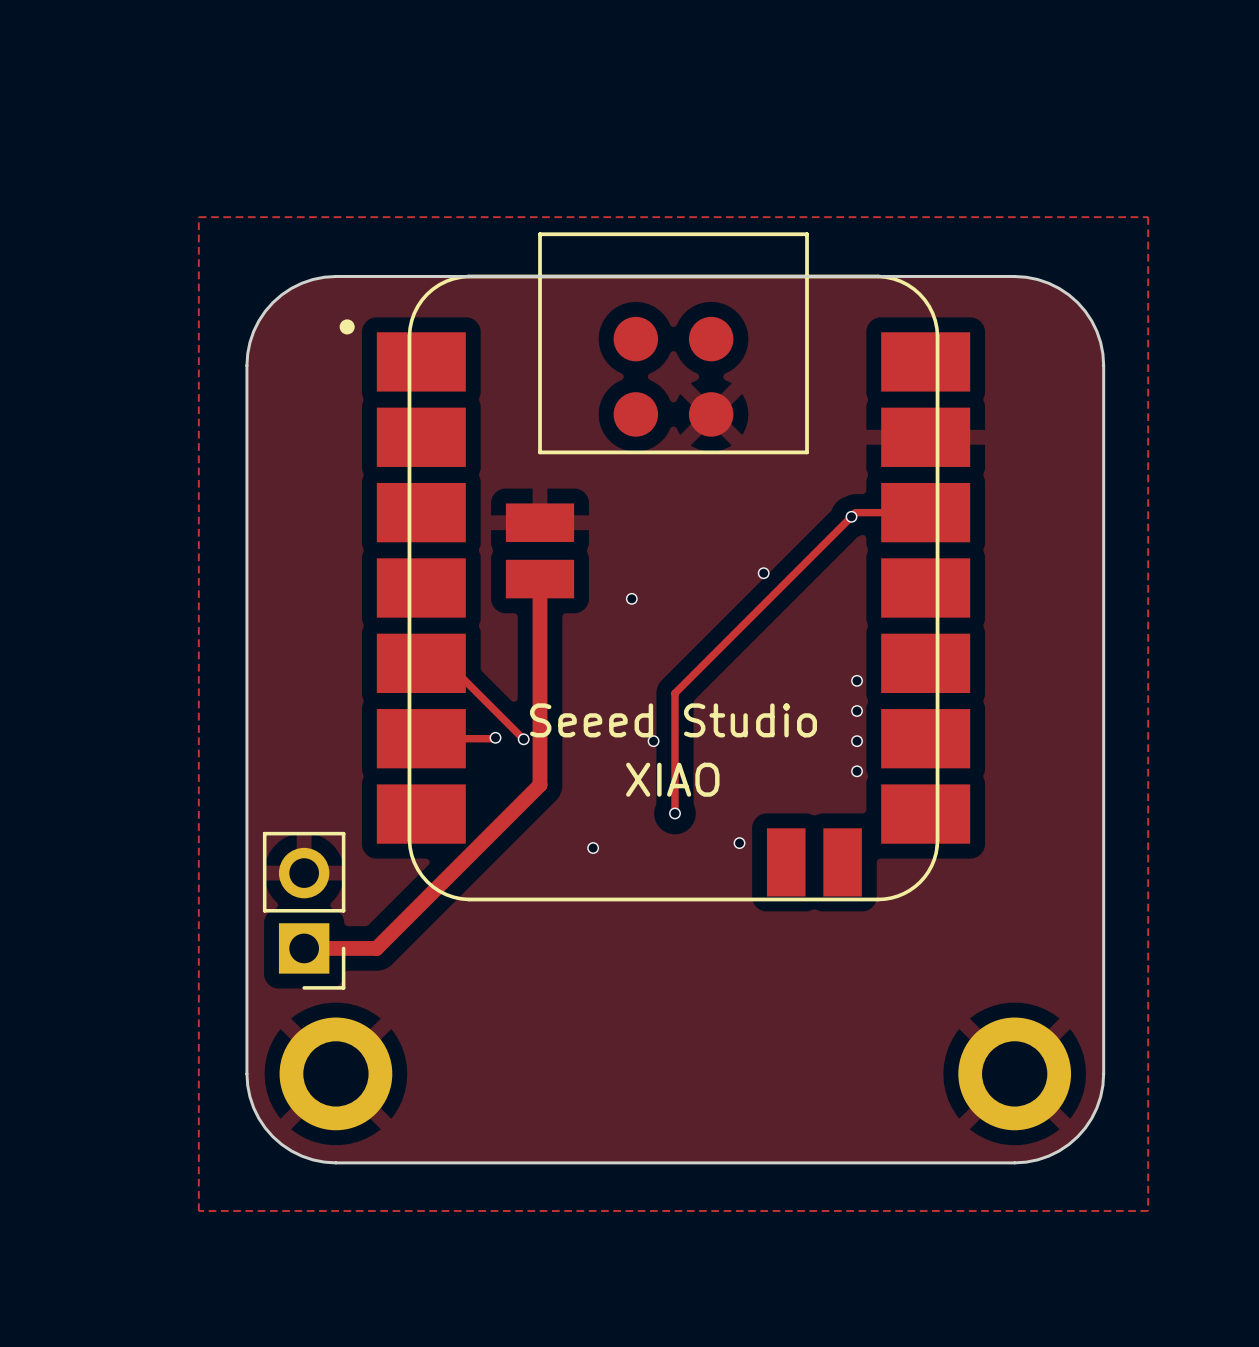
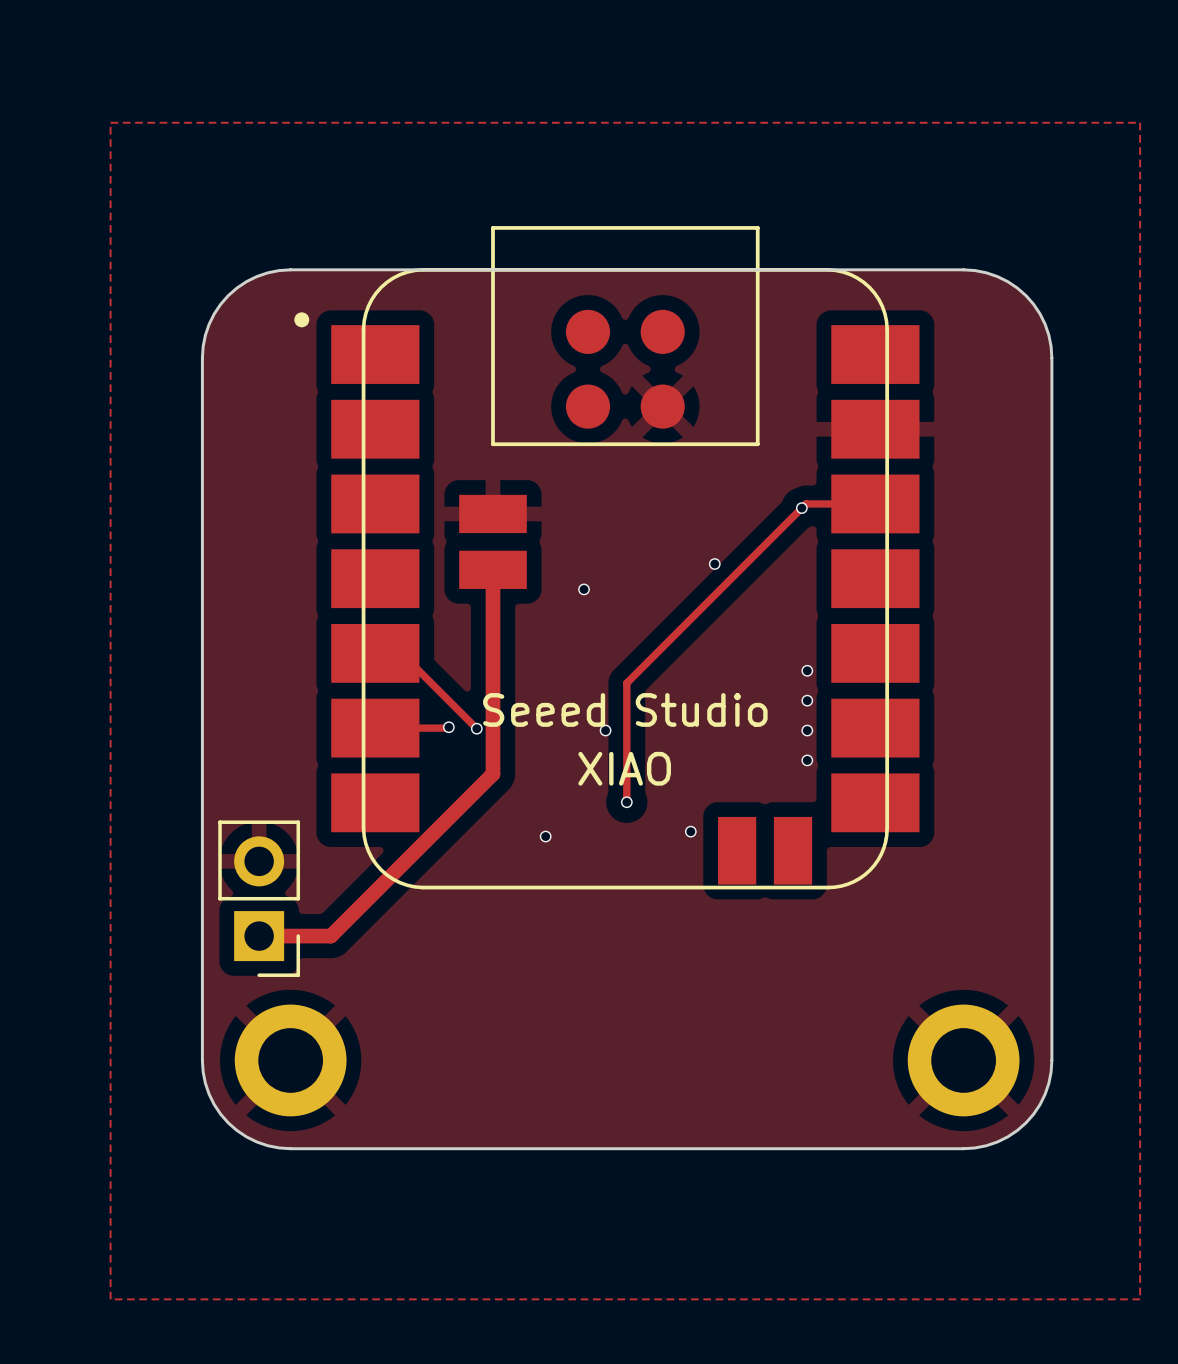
zone outline: (198, 217) (1148, 217) (1148, 1211) (198, 1211) (198, 217) -> (110, 122) (110, 1299) (1140, 1299) (1140, 122) (110, 122)

